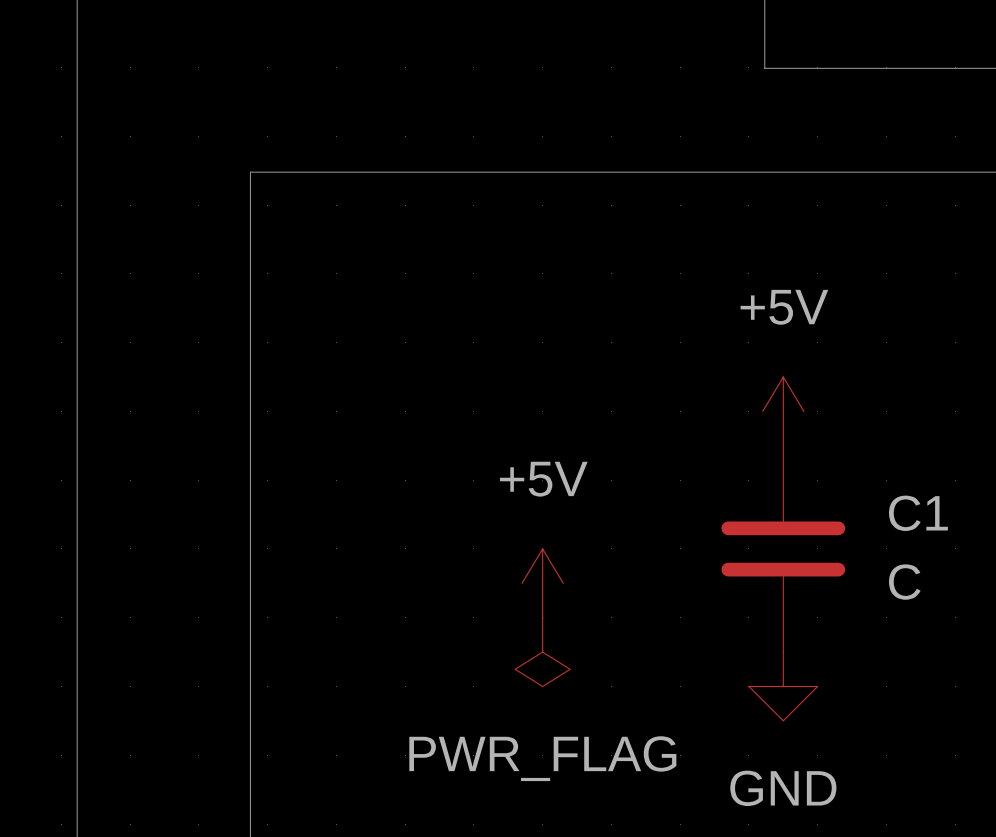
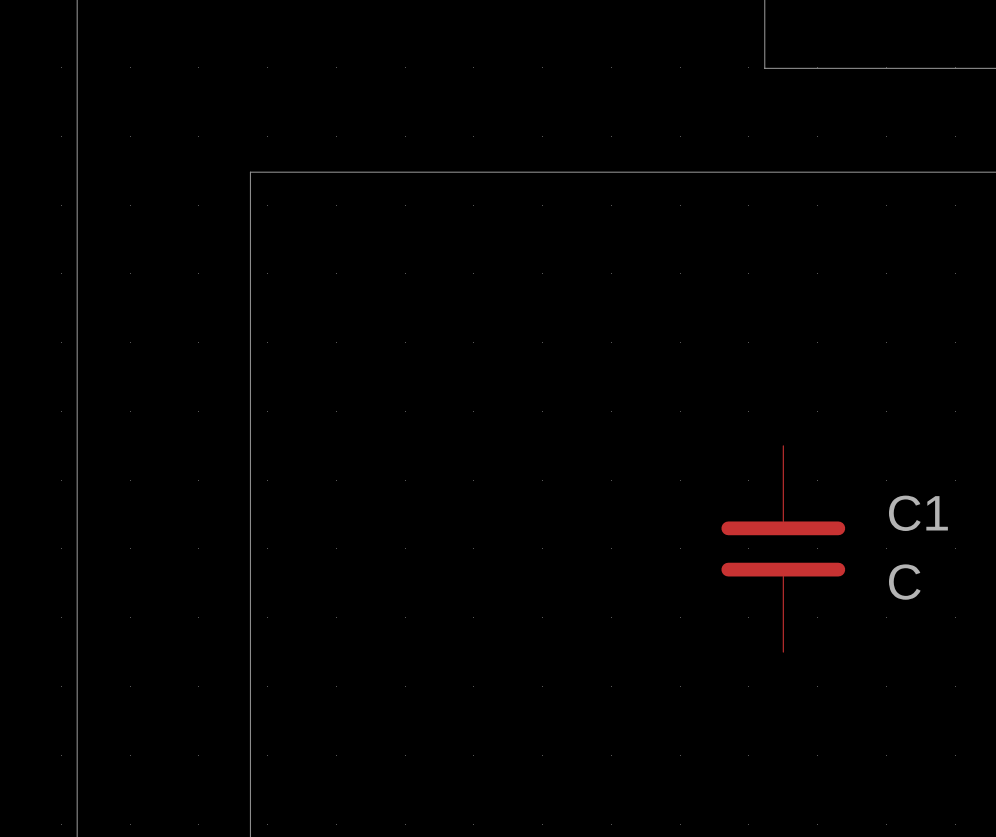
power symbol: +5V (783, 411) -> none
power symbol: +5V (542, 583) -> none
power symbol: PWR_FLAG (542, 652) -> none
power symbol: GND (783, 686) -> none

